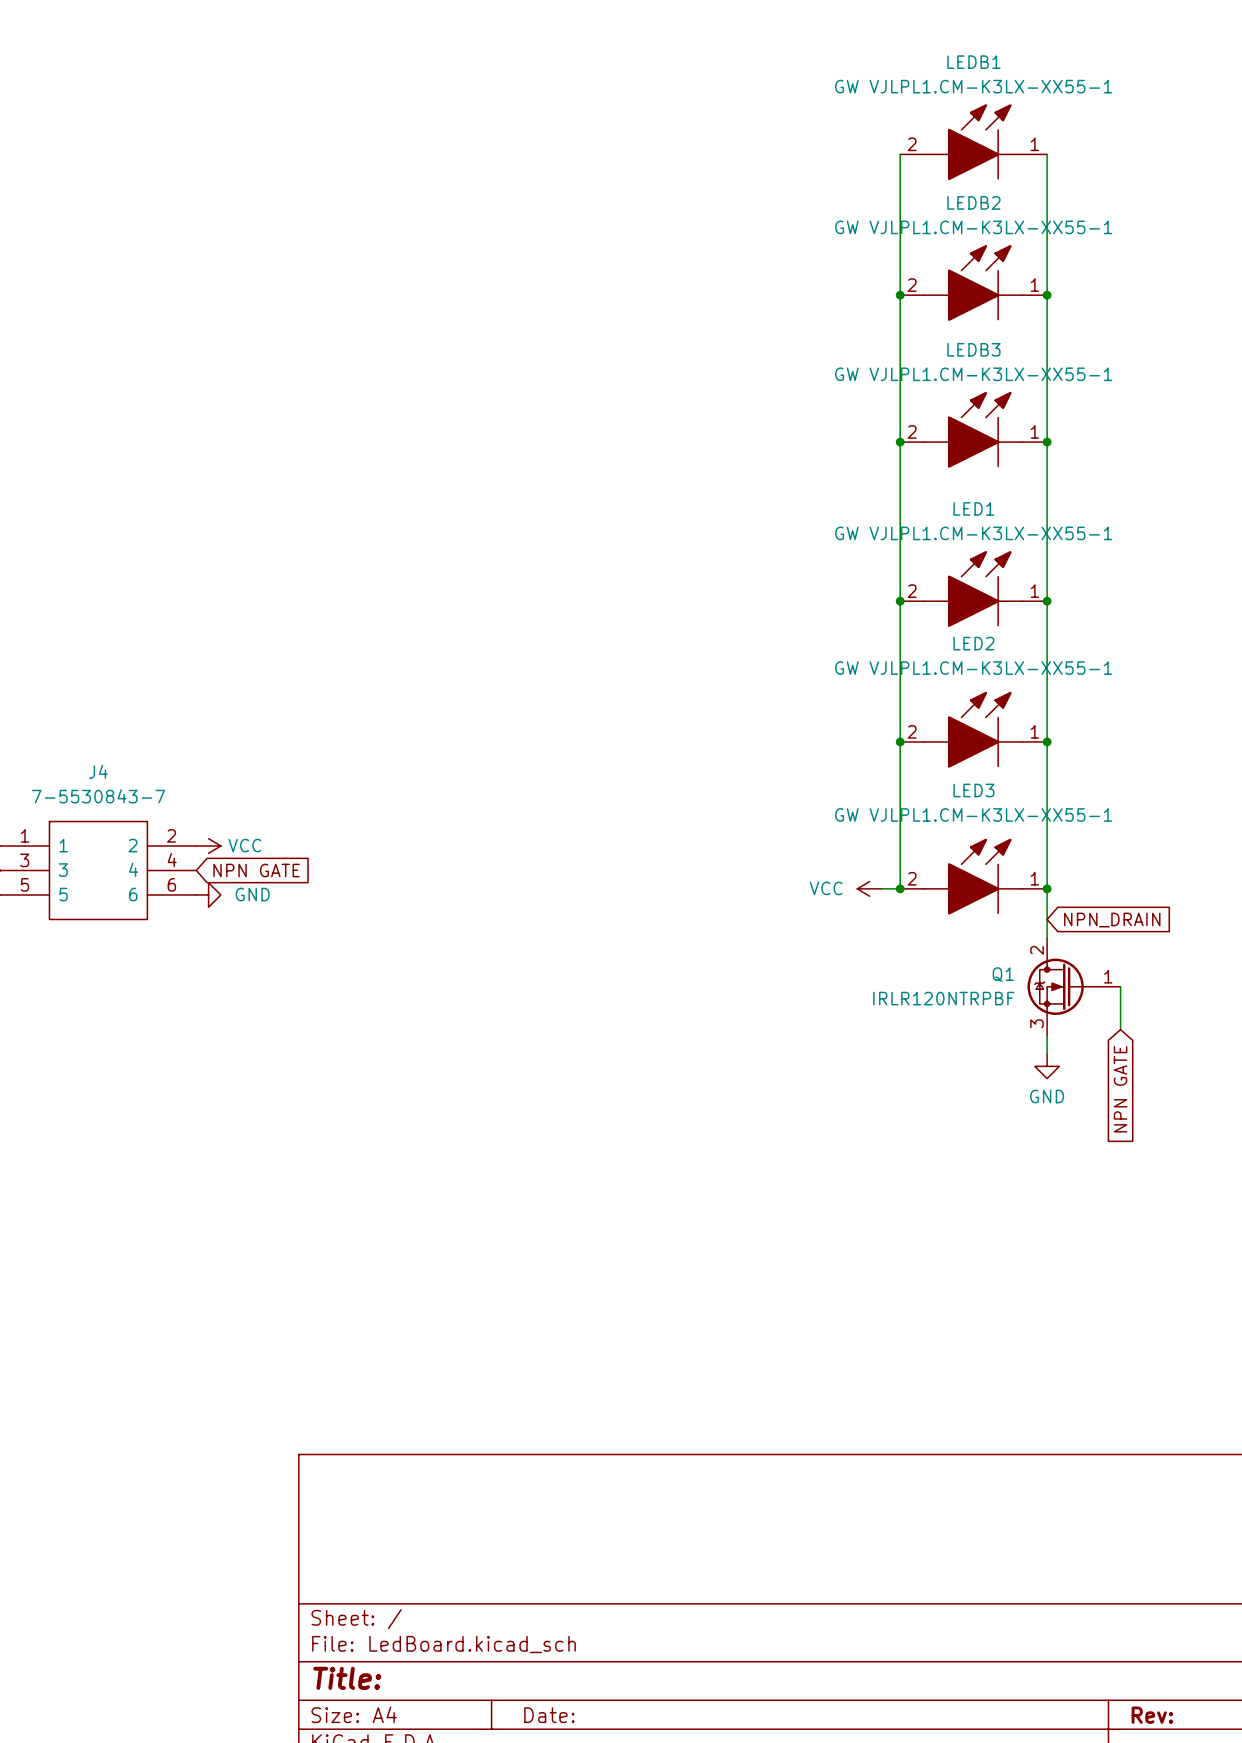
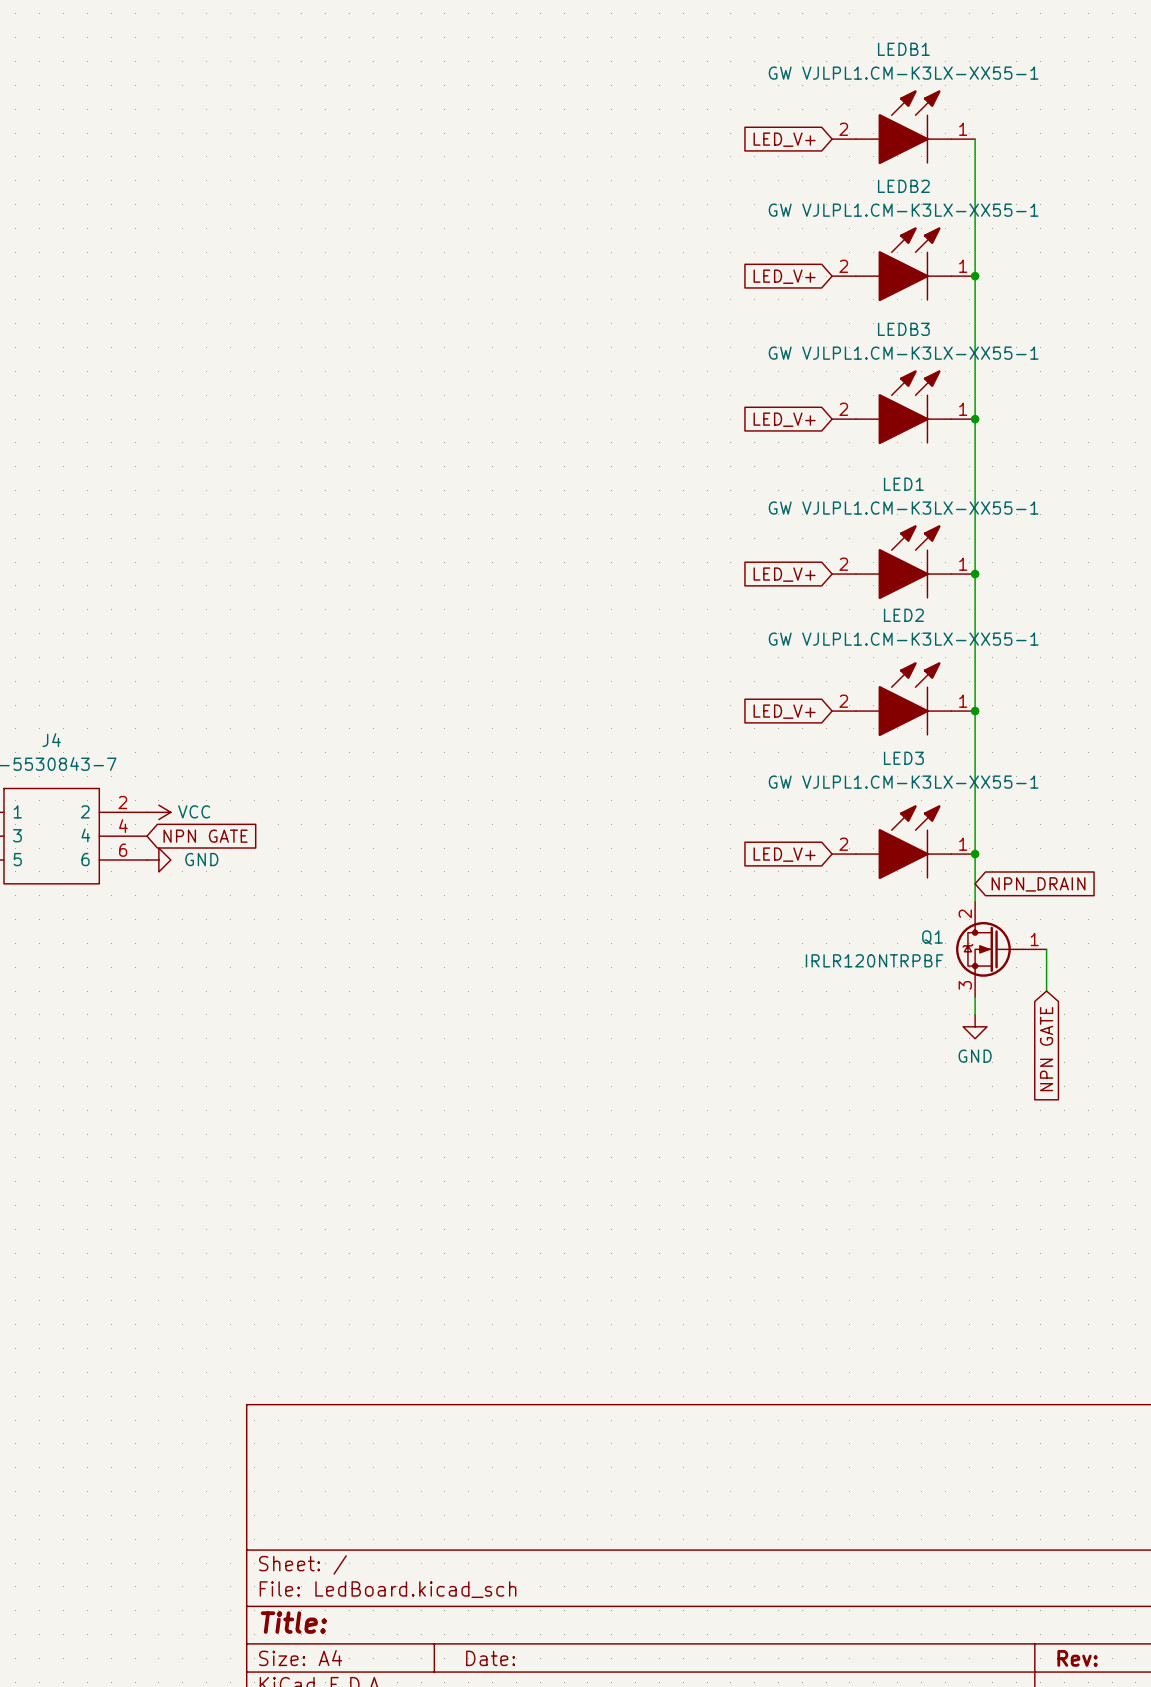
global label: none -> LED_V+ (784, 139)
wire: (900, 154) (900, 888) (881, 888) -> none
global label: none -> LED_V+ (784, 276)
junction: (900, 295) -> none
global label: none -> LED_V+ (784, 419)
junction: (900, 442) -> none
global label: none -> LED_V+ (784, 574)
junction: (900, 601) -> none
junction: (900, 741) -> none
global label: none -> LED_V+ (784, 711)
power symbol: VCC (869, 888) -> none
junction: (900, 888) -> none
global label: none -> LED_V+ (784, 854)

